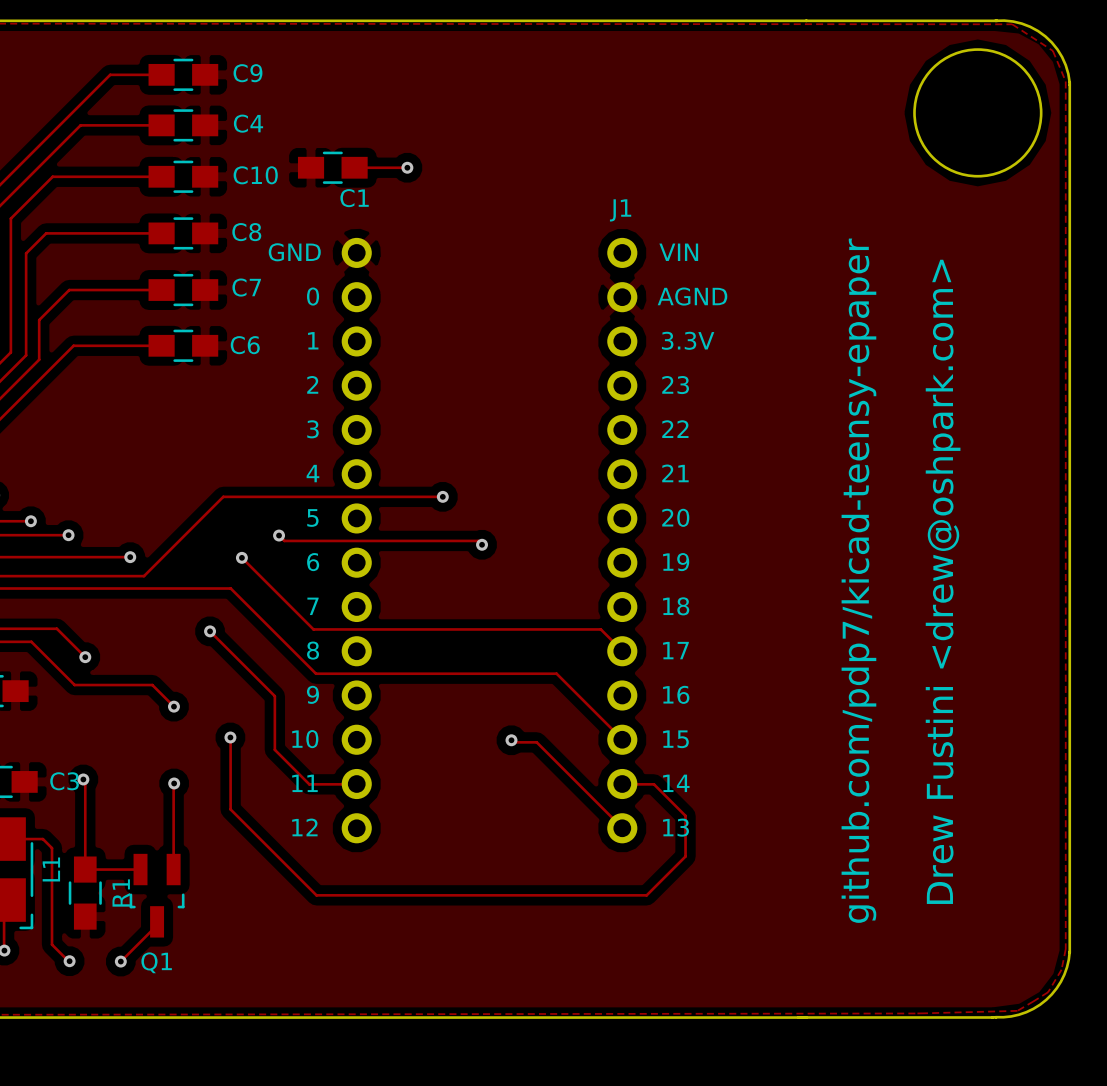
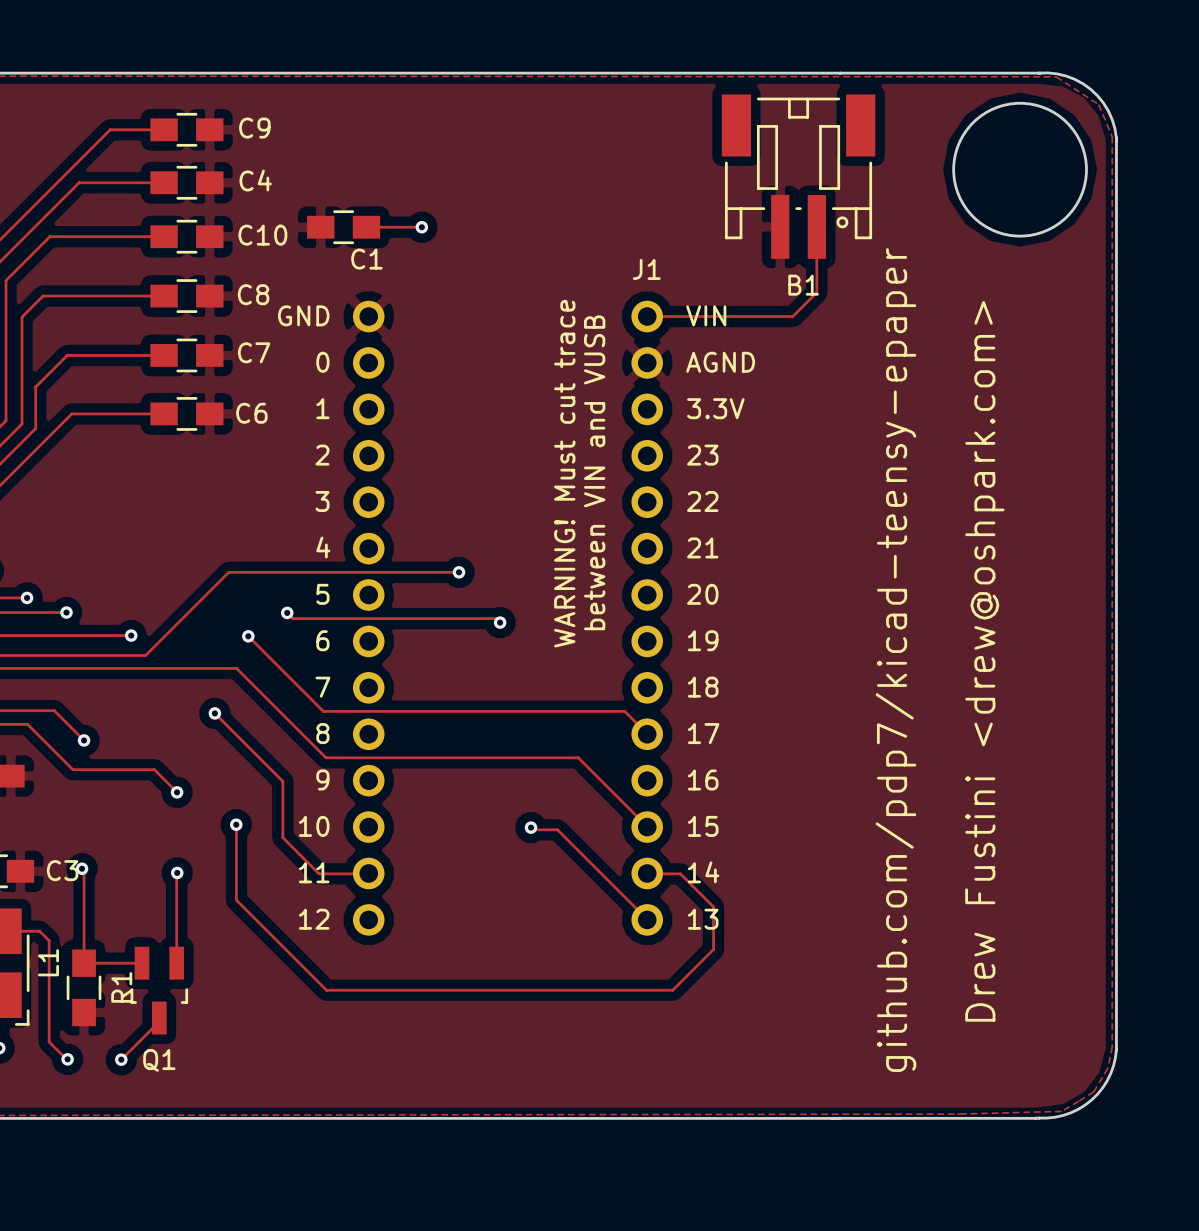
B1: none -> (798, 176)
track: none -> (816, 226) (816, 292) (792, 316) (647, 316)
text: none -> WARNING! Must cut trace (564, 473)
text: none -> between VIN and VUSB (594, 472)

